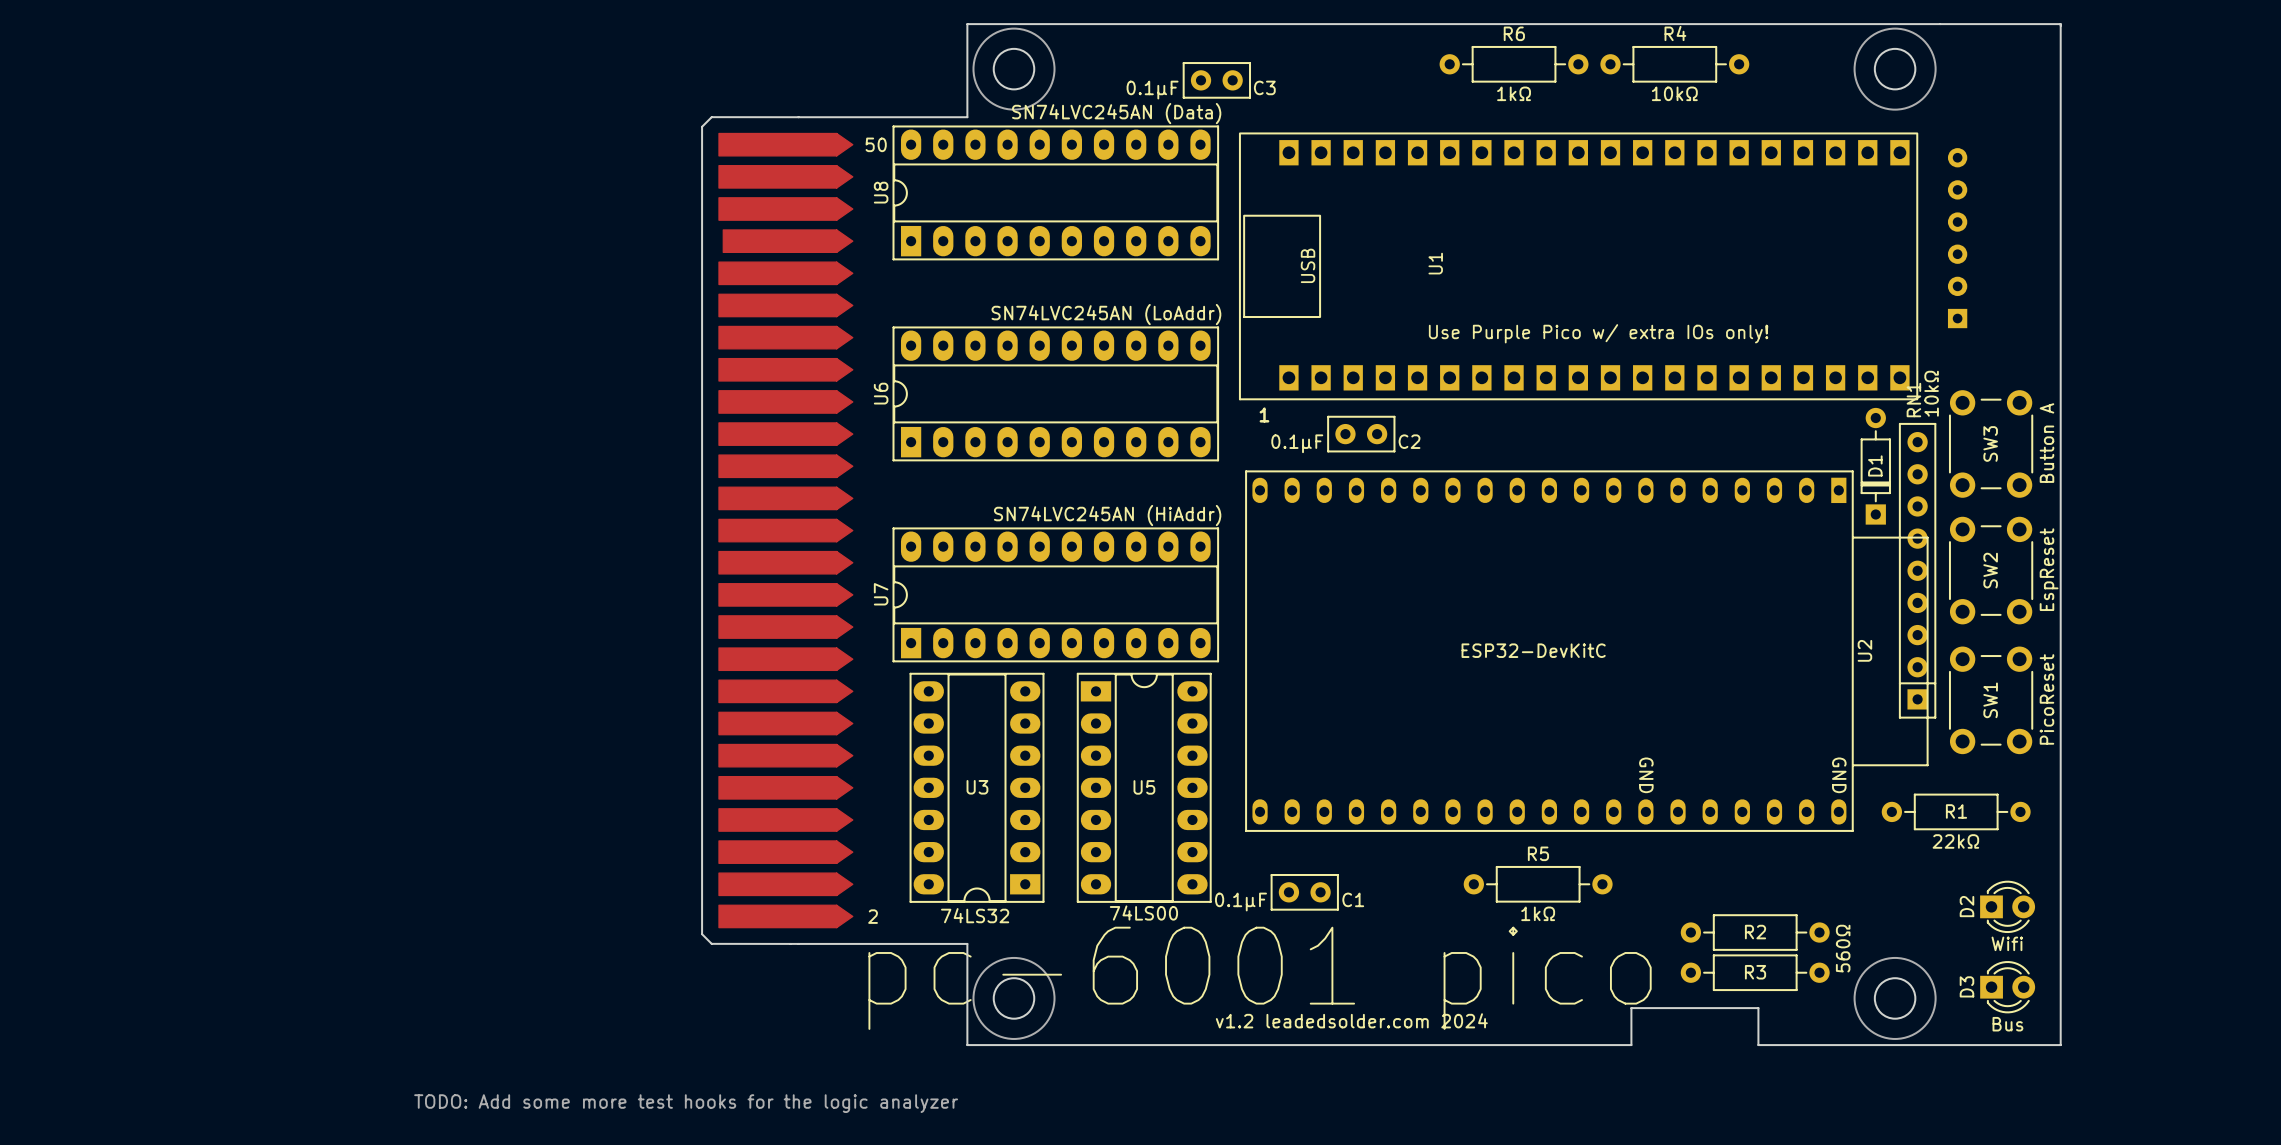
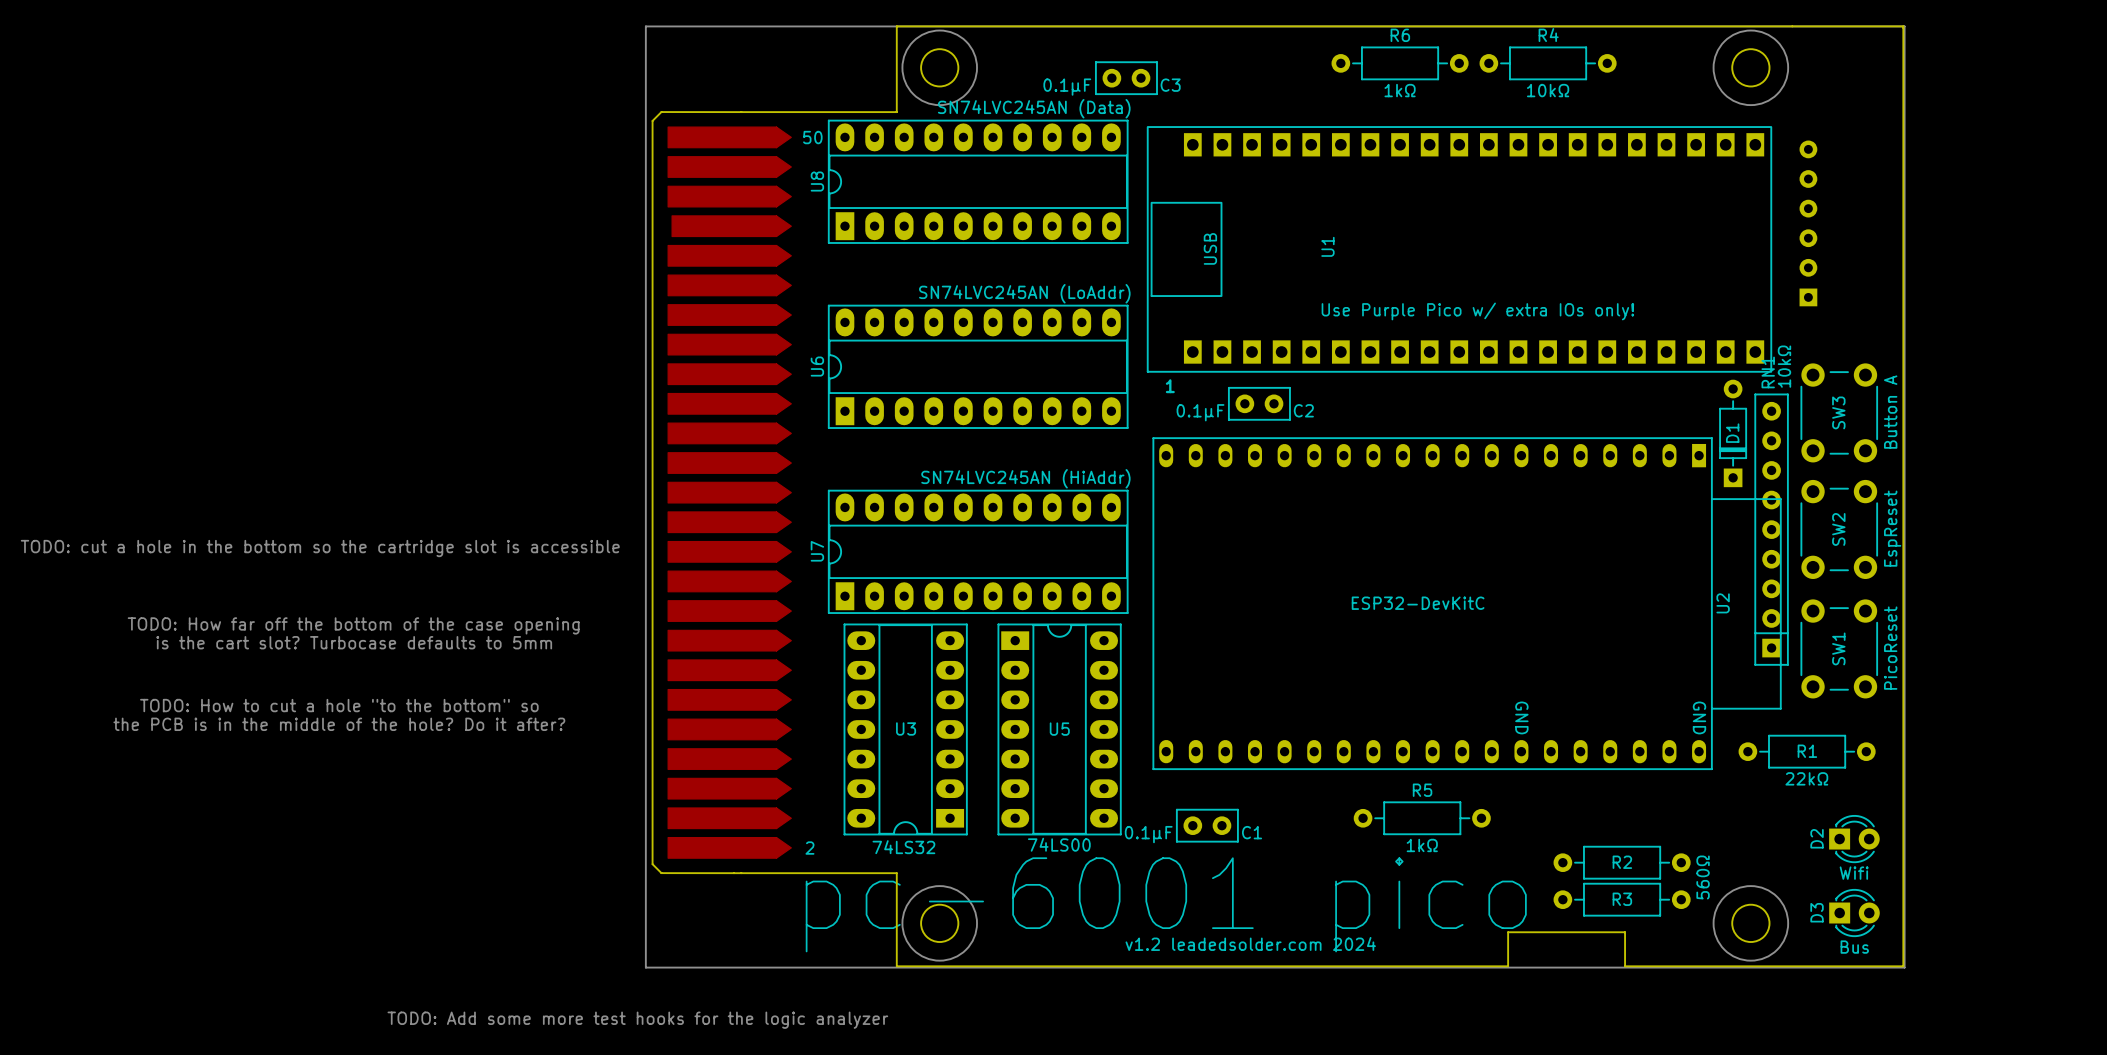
line: none -> (645, 26) (1904, 26) (1904, 967) (645, 967) (645, 26)
text: none -> TODO: cut a hole in the bottom so the cartridge slot is accessible (320, 548)
text: none -> TODO: How far off the bottom of the case opening (353, 625)
text: none -> is the cart slot? Turbocase defaults to 5mm (354, 642)
text: none -> TODO: How to cut a hole "to the bottom" so (339, 705)
text: none -> the PCB is in the middle of the hole? Do it after? (339, 724)

